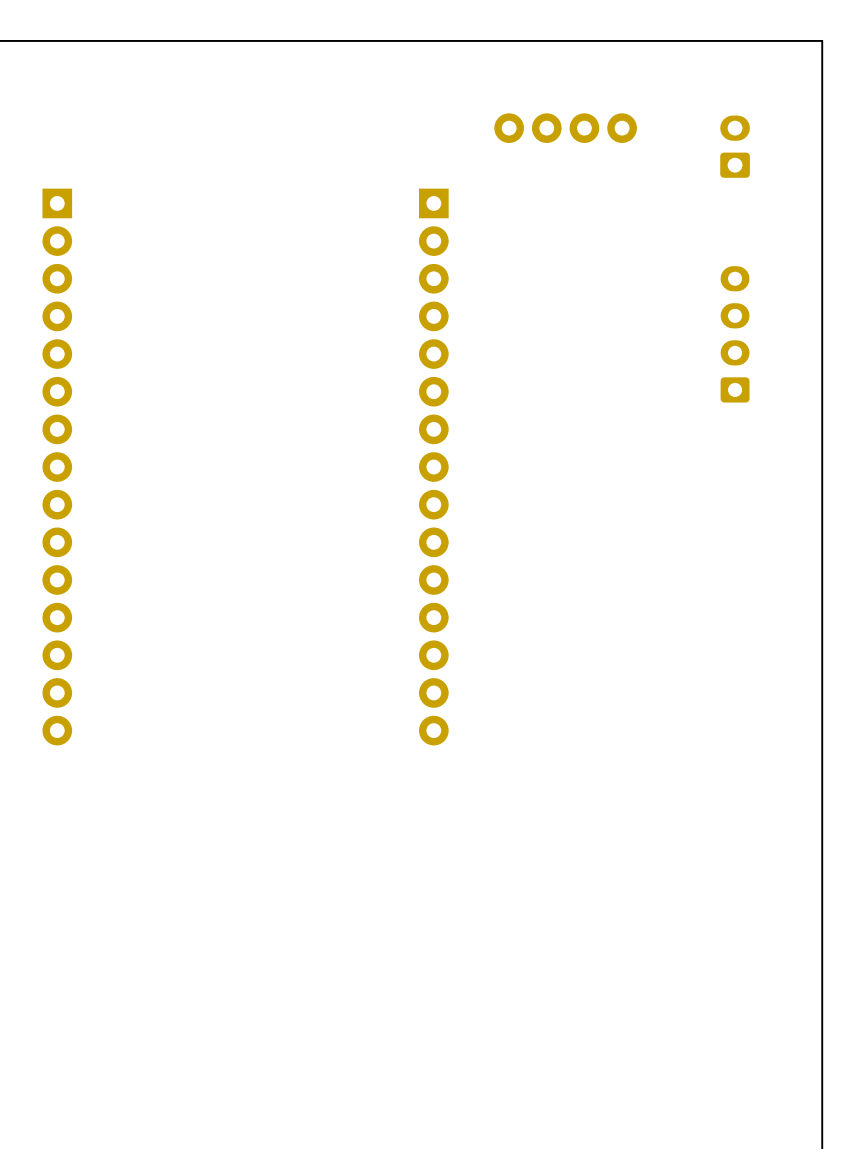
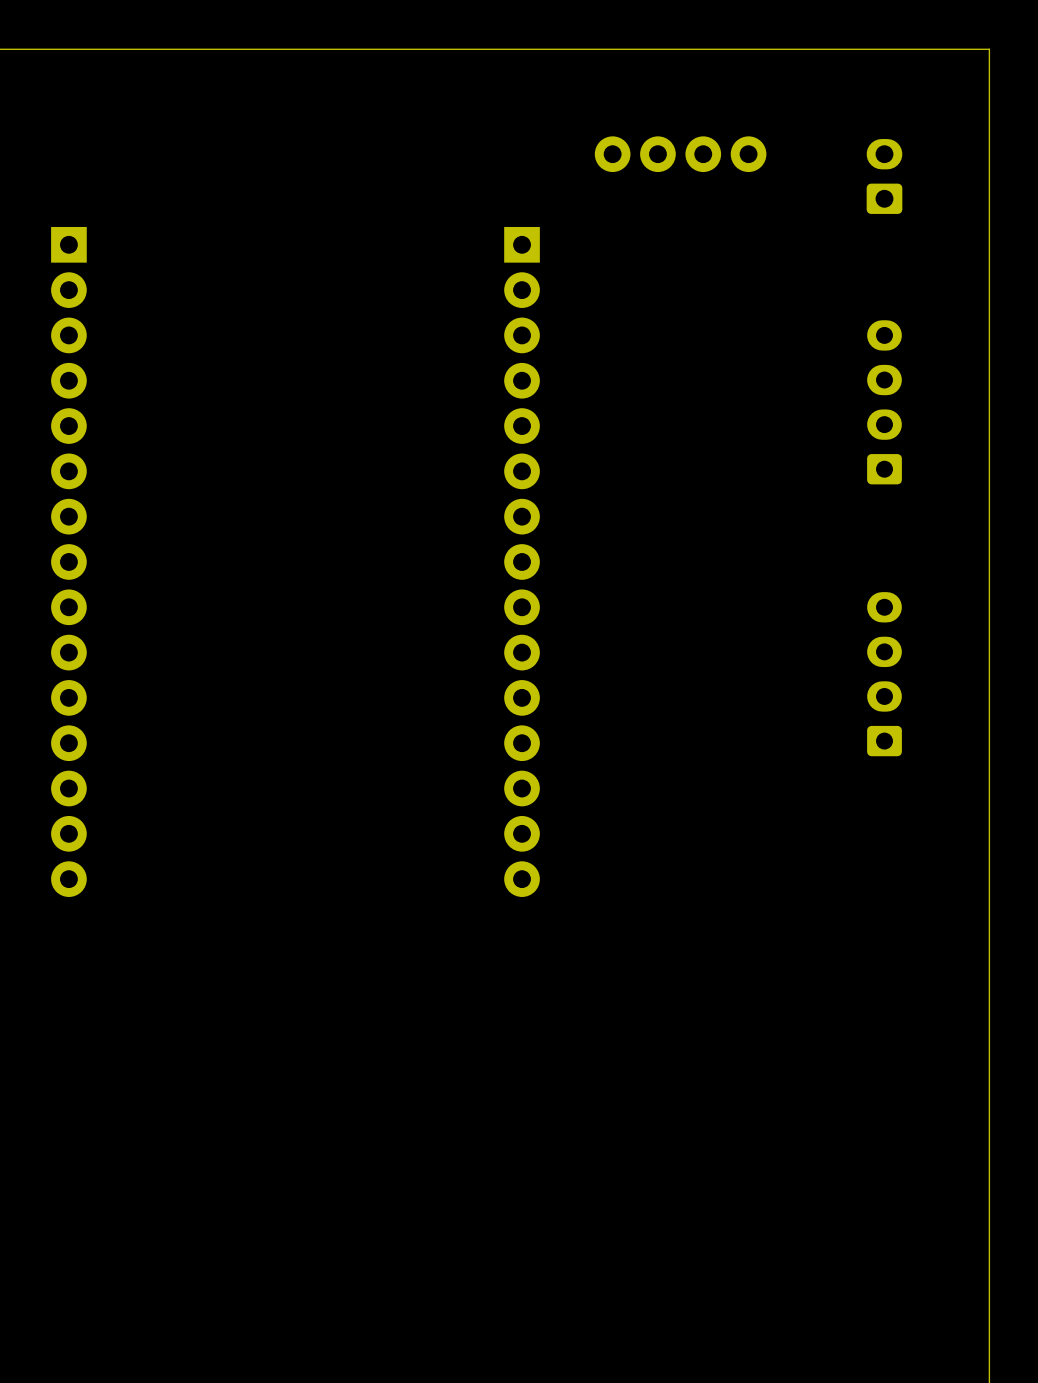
part: none -> (884, 674)

